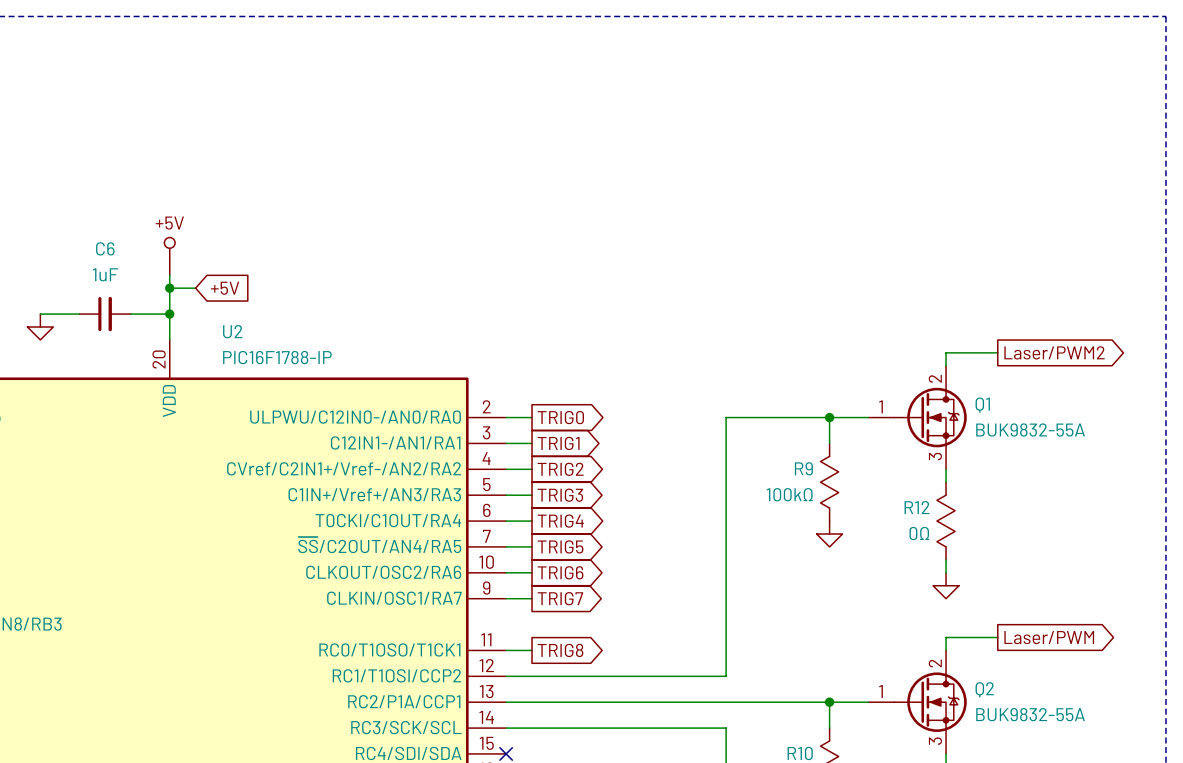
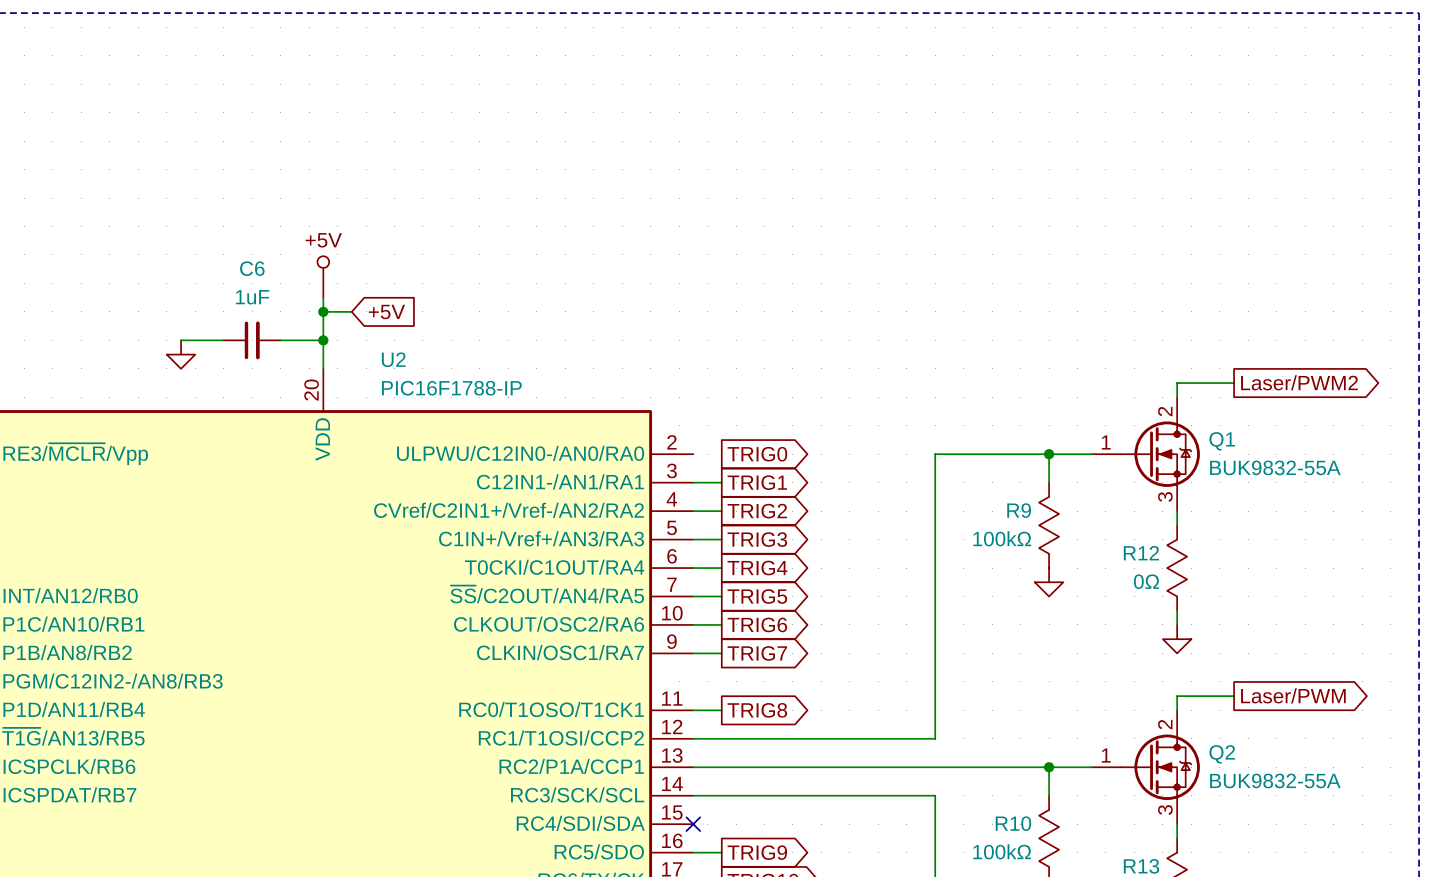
wire: (506, 417) (532, 417) -> none

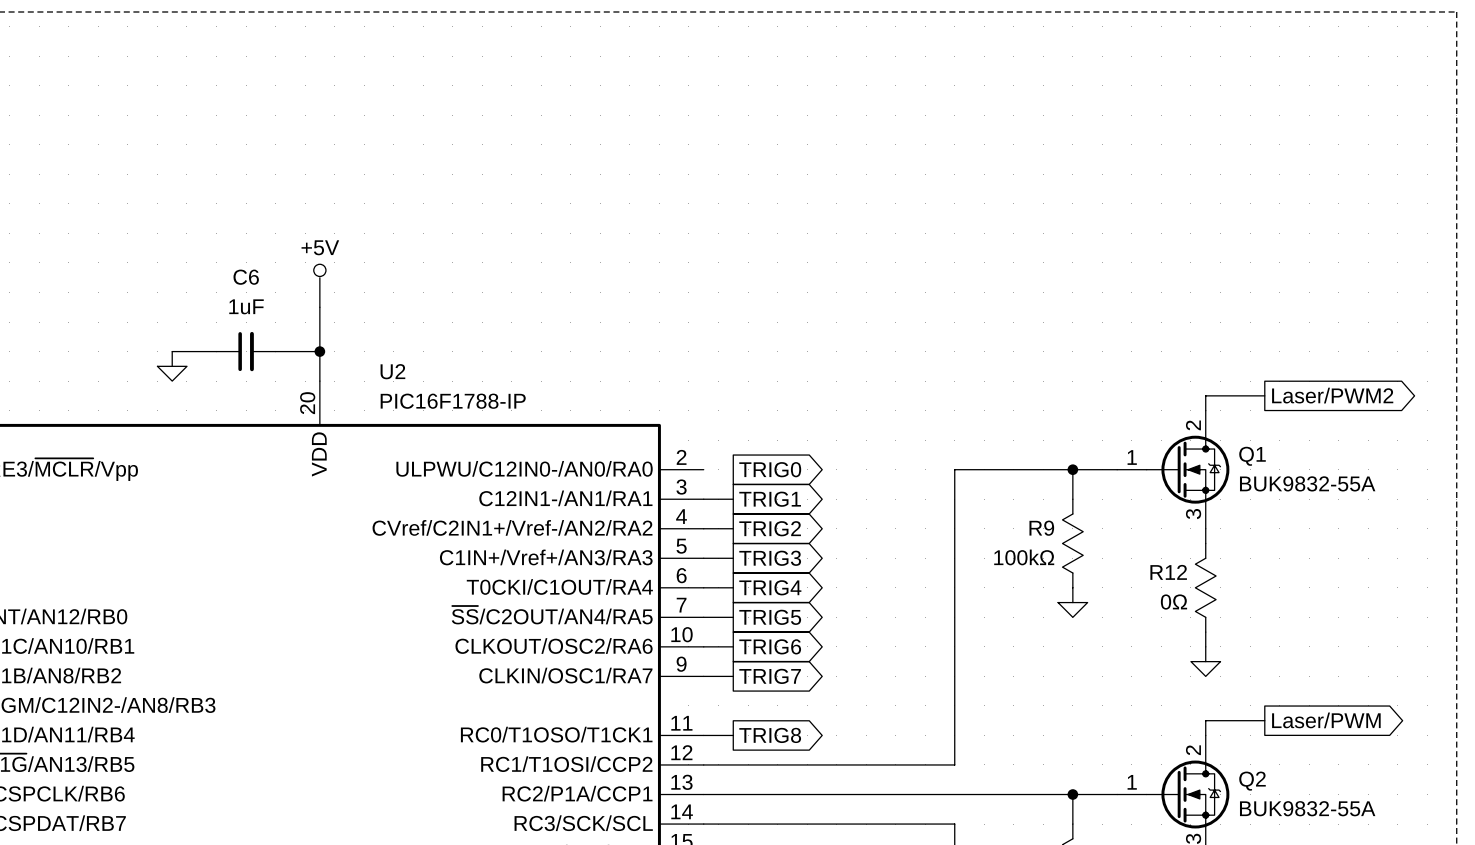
wire: (323, 311) (351, 311) -> none
junction: (323, 311) -> none
global label: +5V (386, 312) -> none

